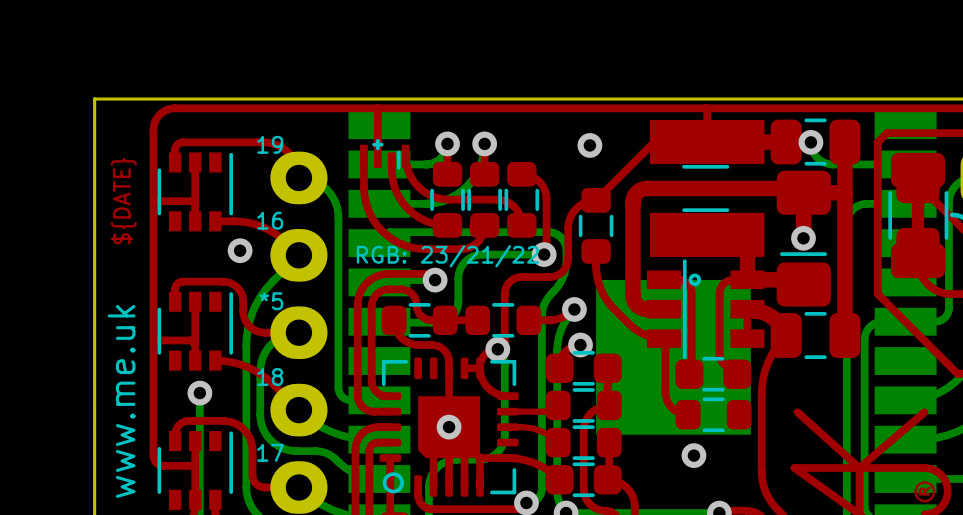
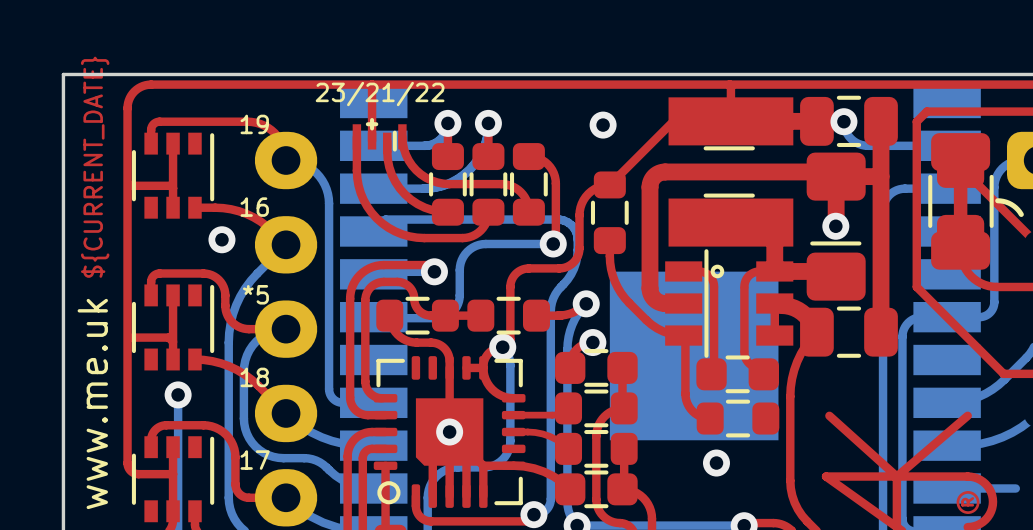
text: none -> 23/21/22 (380, 94)
text: ${DATE} (123, 201) -> ${CURRENT_DATE} (95, 167)
text: RGB: 23/21/22 (447, 256) -> none

